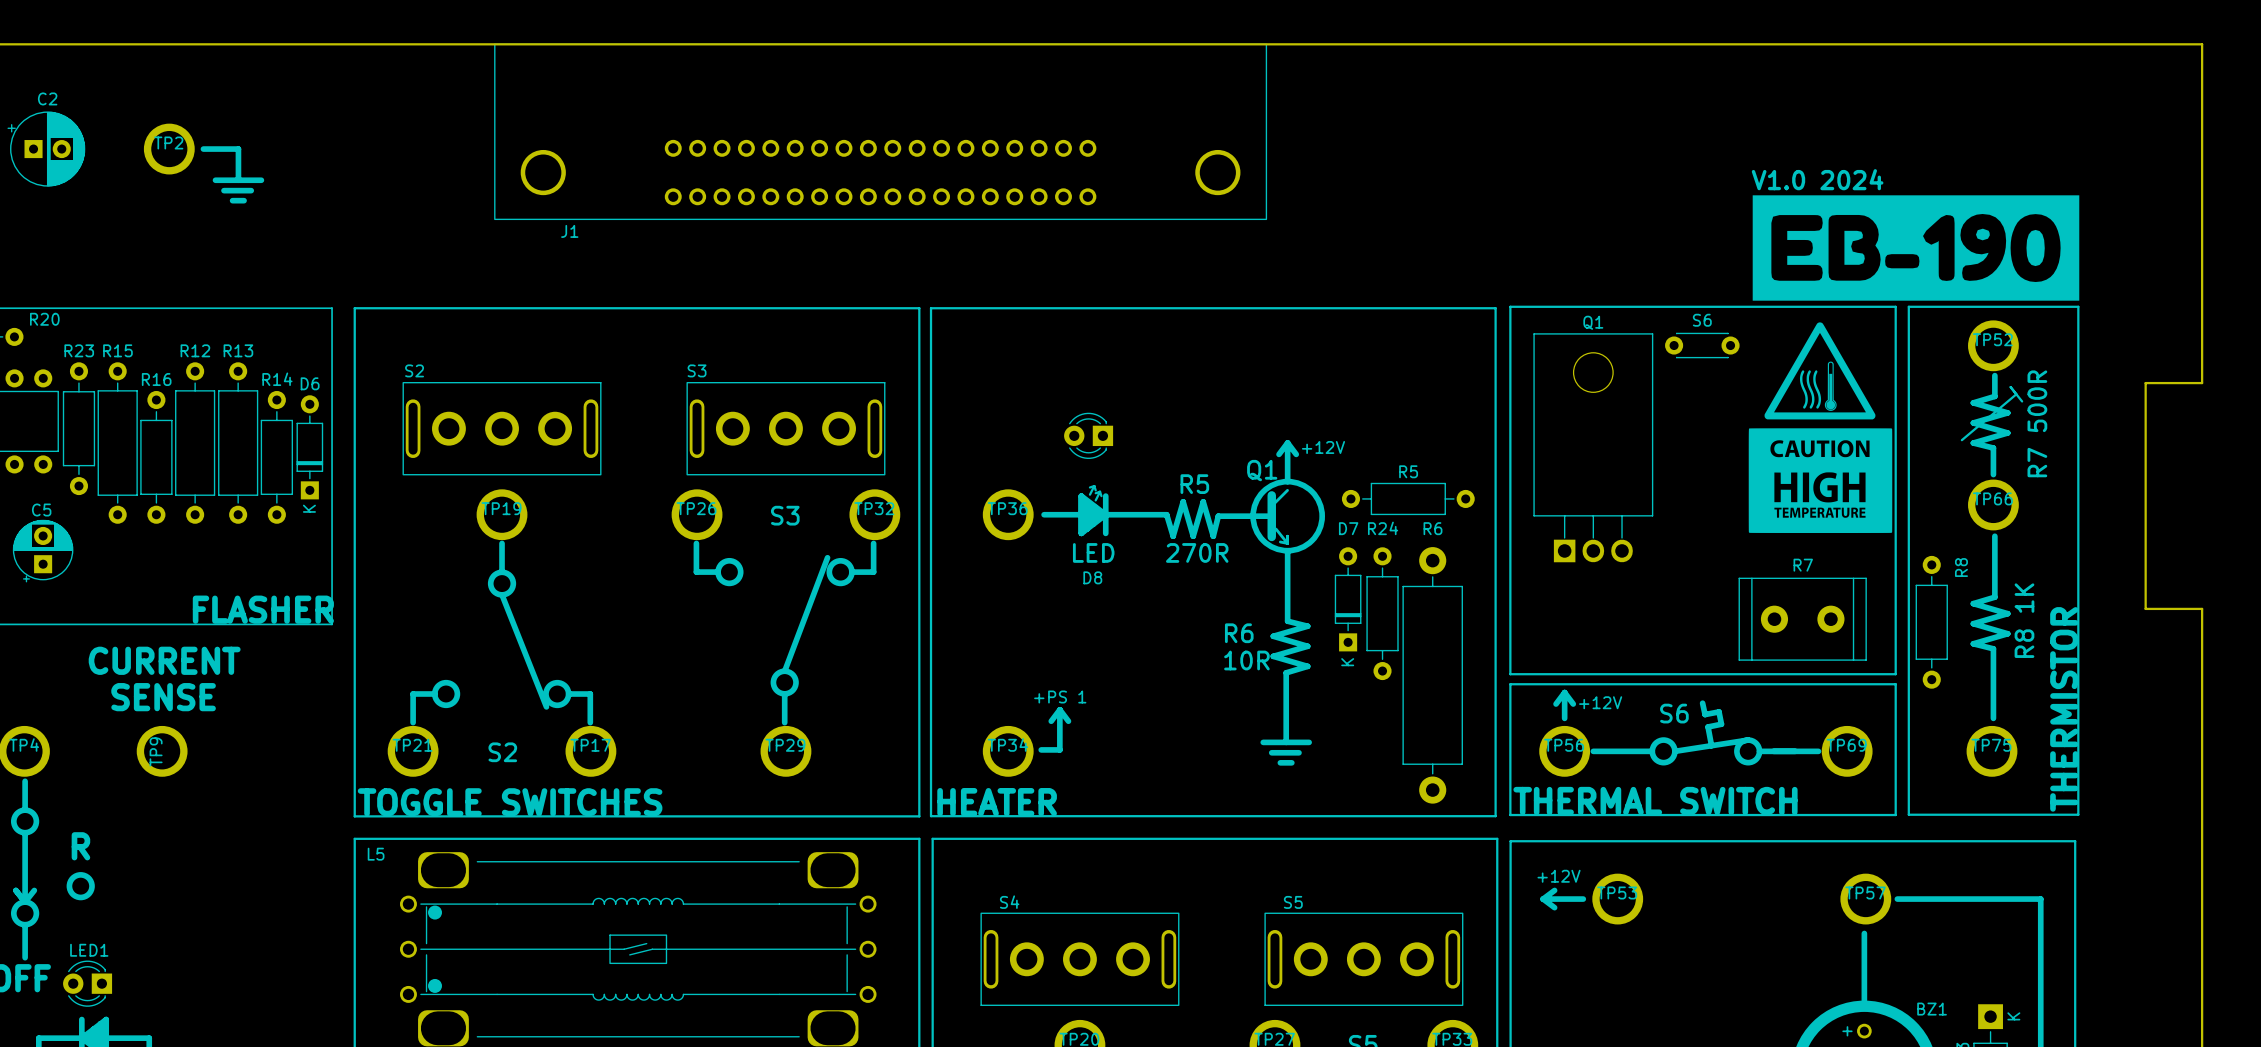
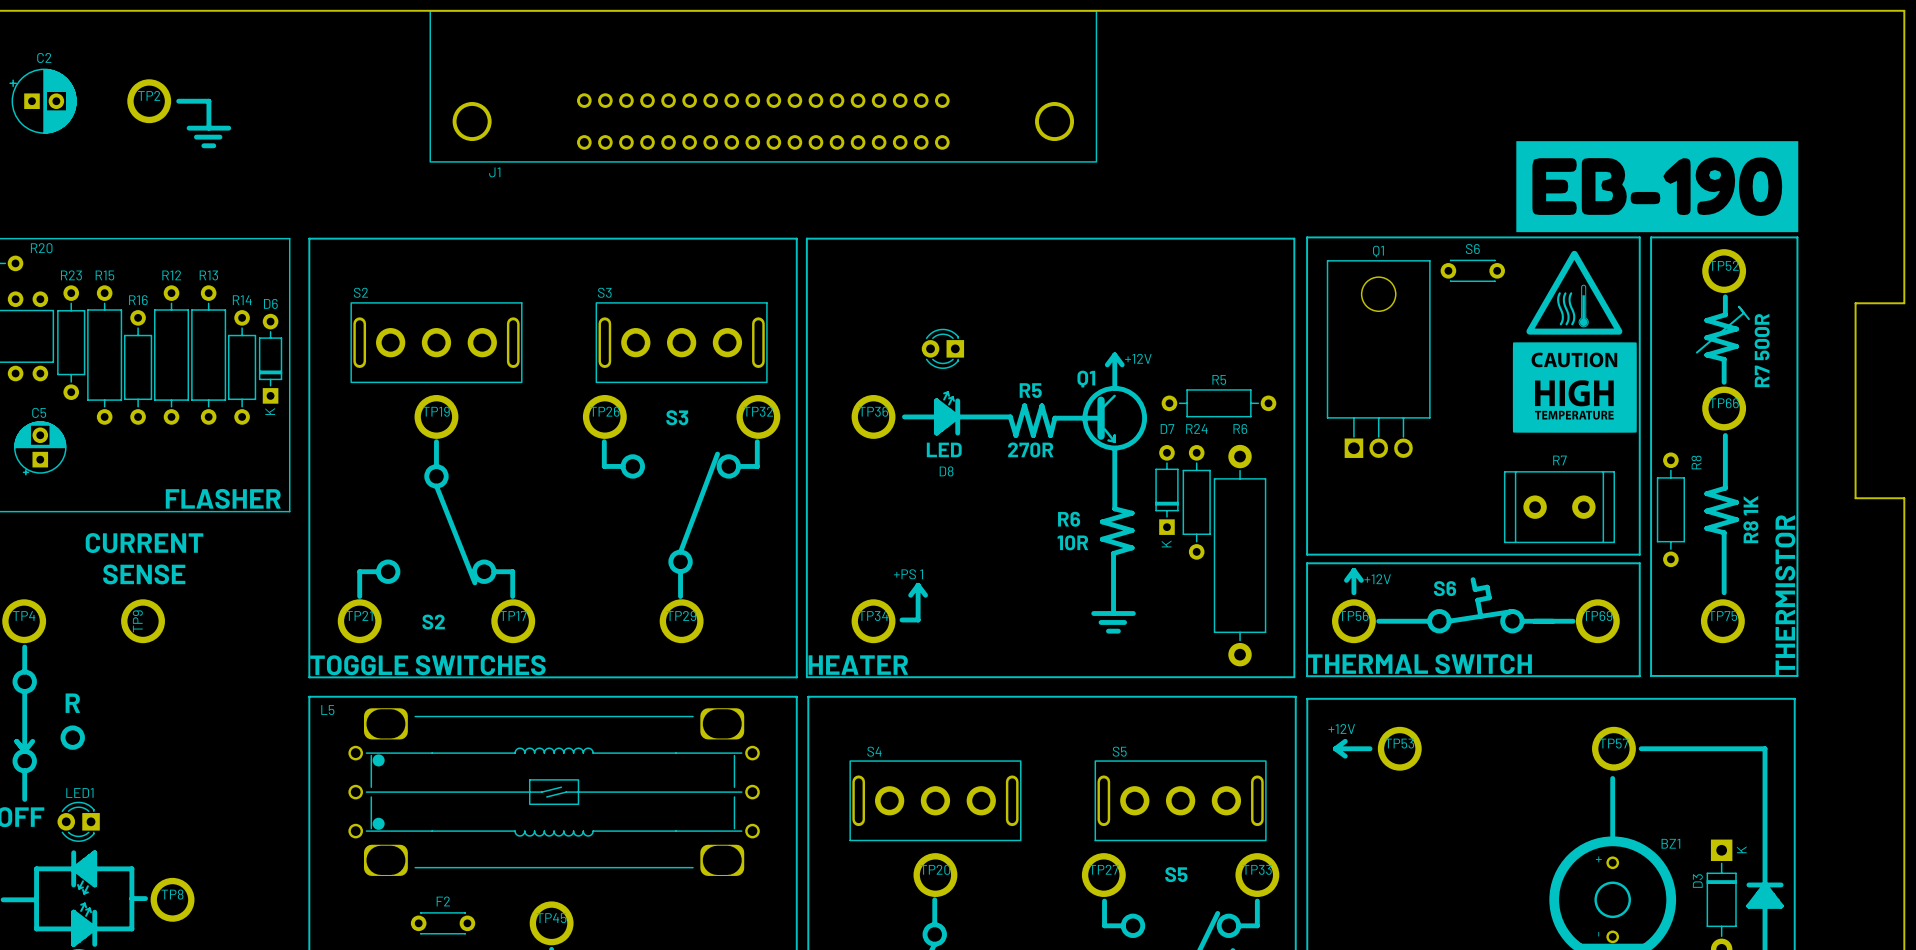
text: V1.0 2024 (1817, 179) -> none

